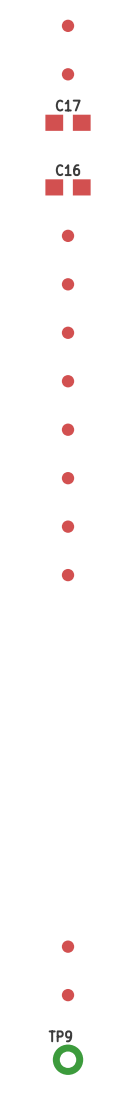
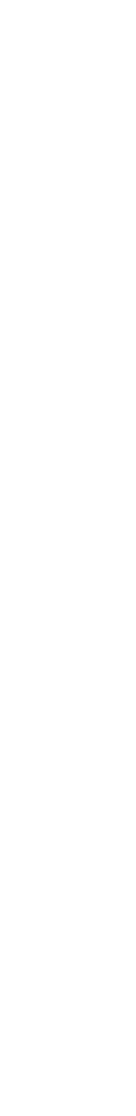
part: (68, 25) -> none
part: (68, 74) -> none
C17: (68, 122) -> none
C16: (68, 187) -> none
part: (68, 235) -> none
part: (68, 284) -> none
part: (68, 332) -> none
part: (68, 381) -> none
part: (68, 429) -> none
part: (68, 478) -> none
part: (68, 526) -> none
part: (68, 575) -> none
part: (68, 946) -> none
part: (68, 995) -> none
TP9: (68, 1059) -> none

